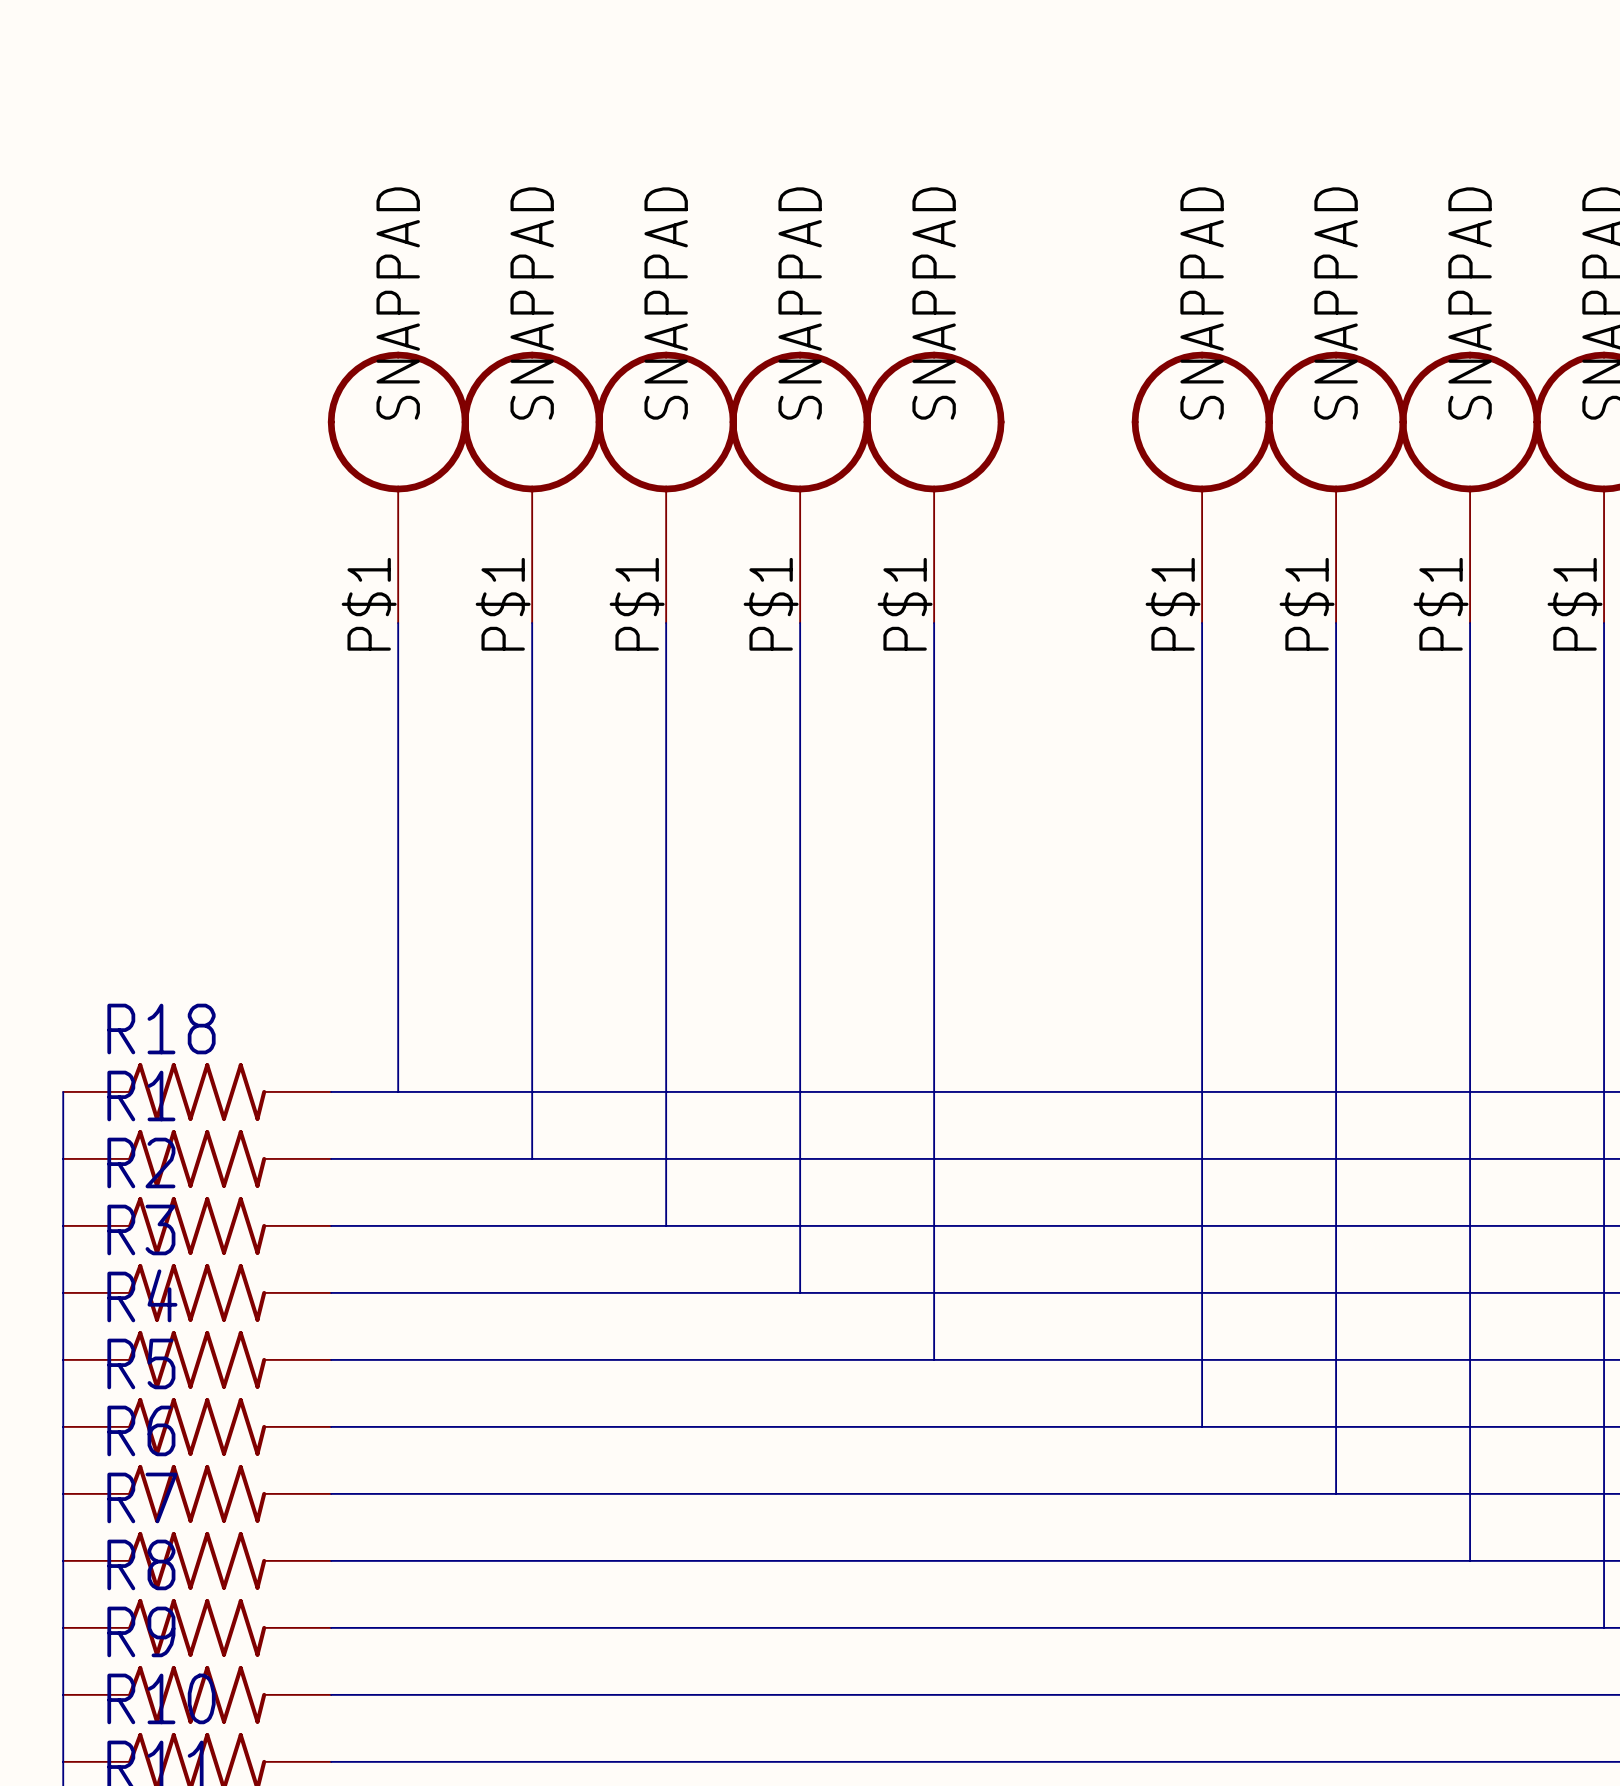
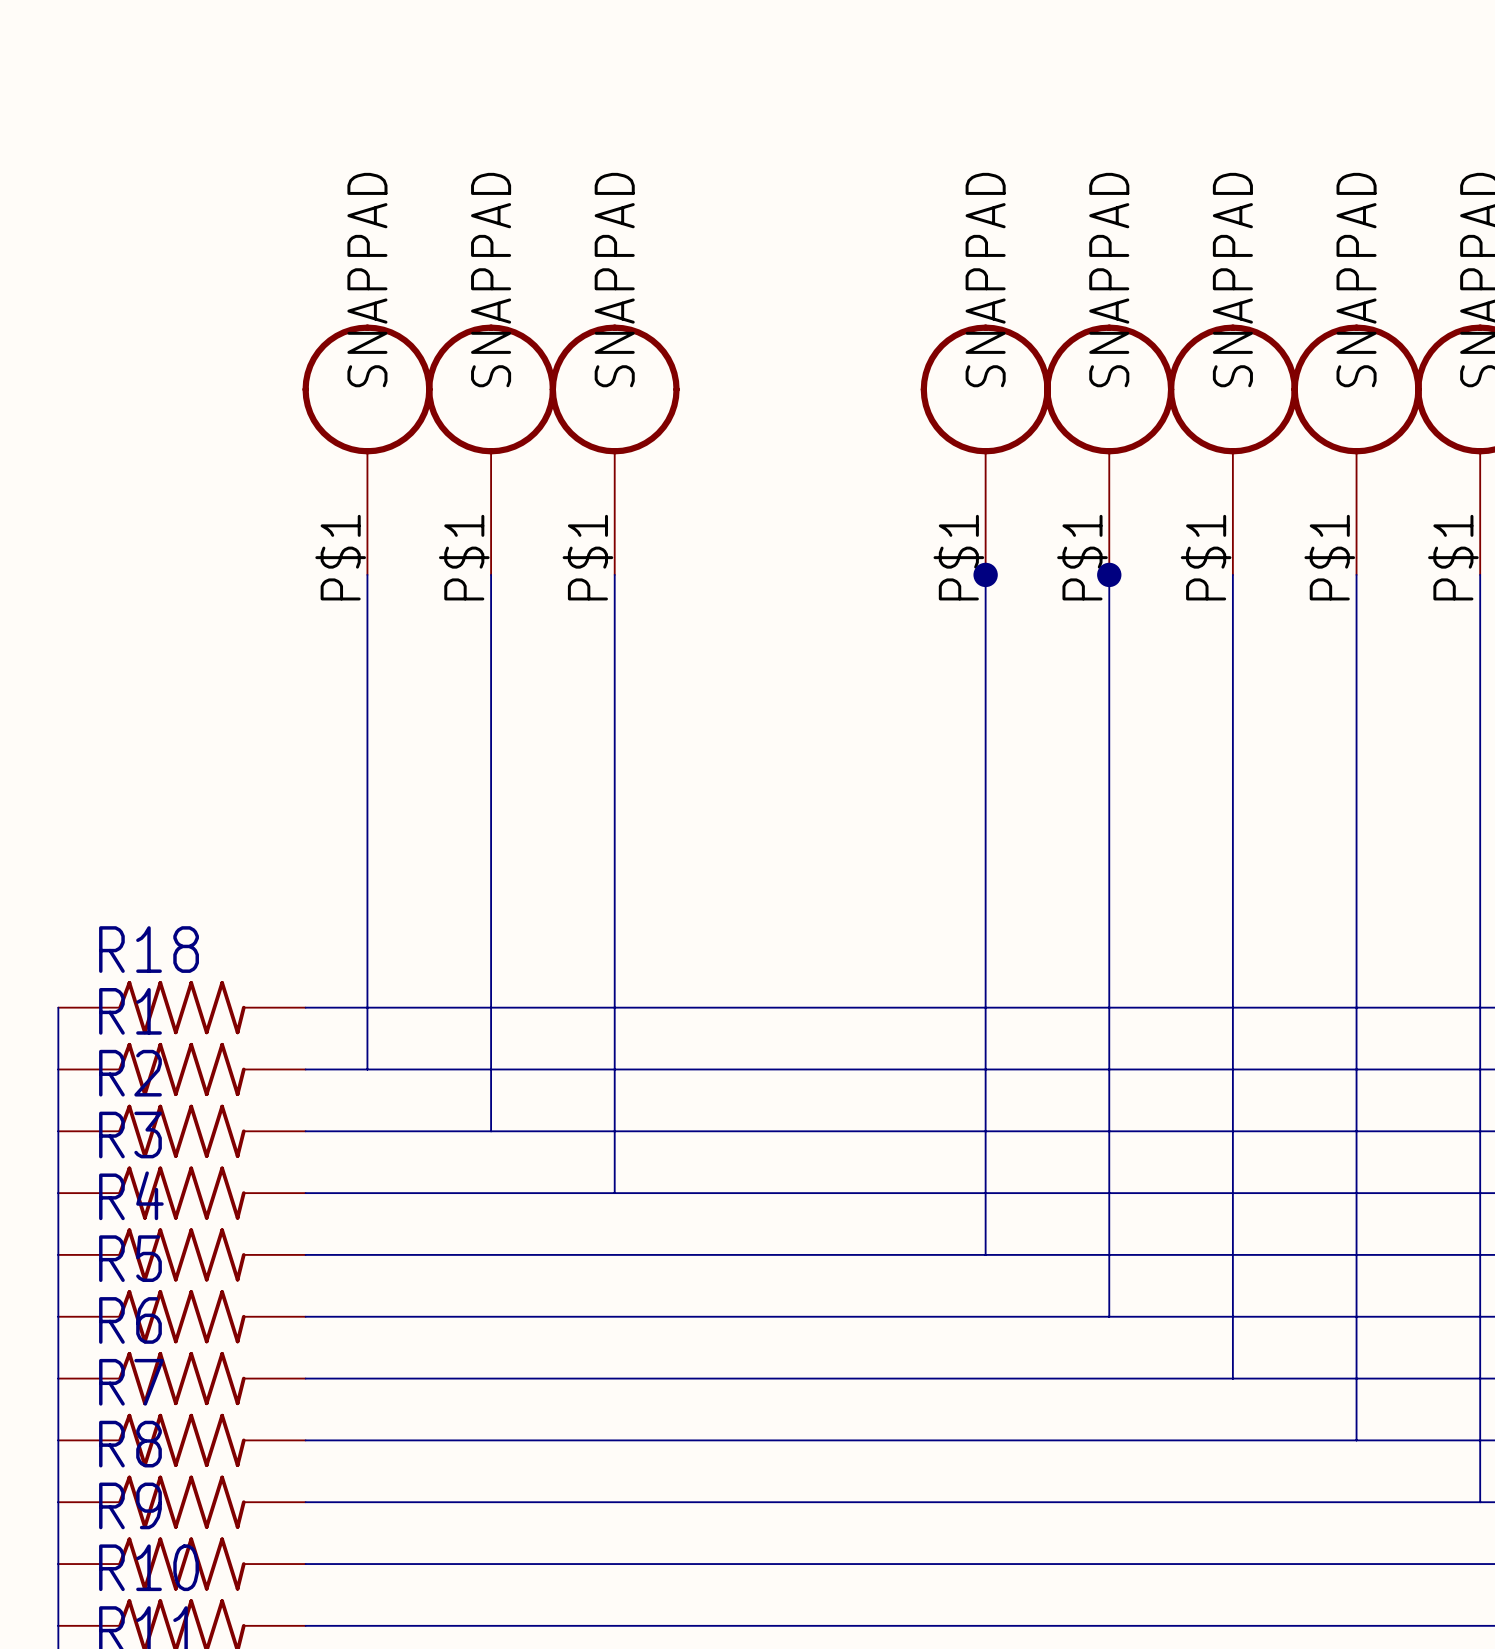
part: (800, 487) -> none
part: (934, 487) -> none
part: none -> (985, 449)
wire: (800, 623) (800, 1292) -> none
wire: (934, 623) (934, 1359) -> (985, 574) (985, 1254)
junction: none -> (985, 574)
junction: none -> (1109, 574)
wire: none -> (367, 1007) (367, 1069)
wire: none -> (491, 1069) (491, 1131)
wire: none -> (614, 1131) (614, 1193)

